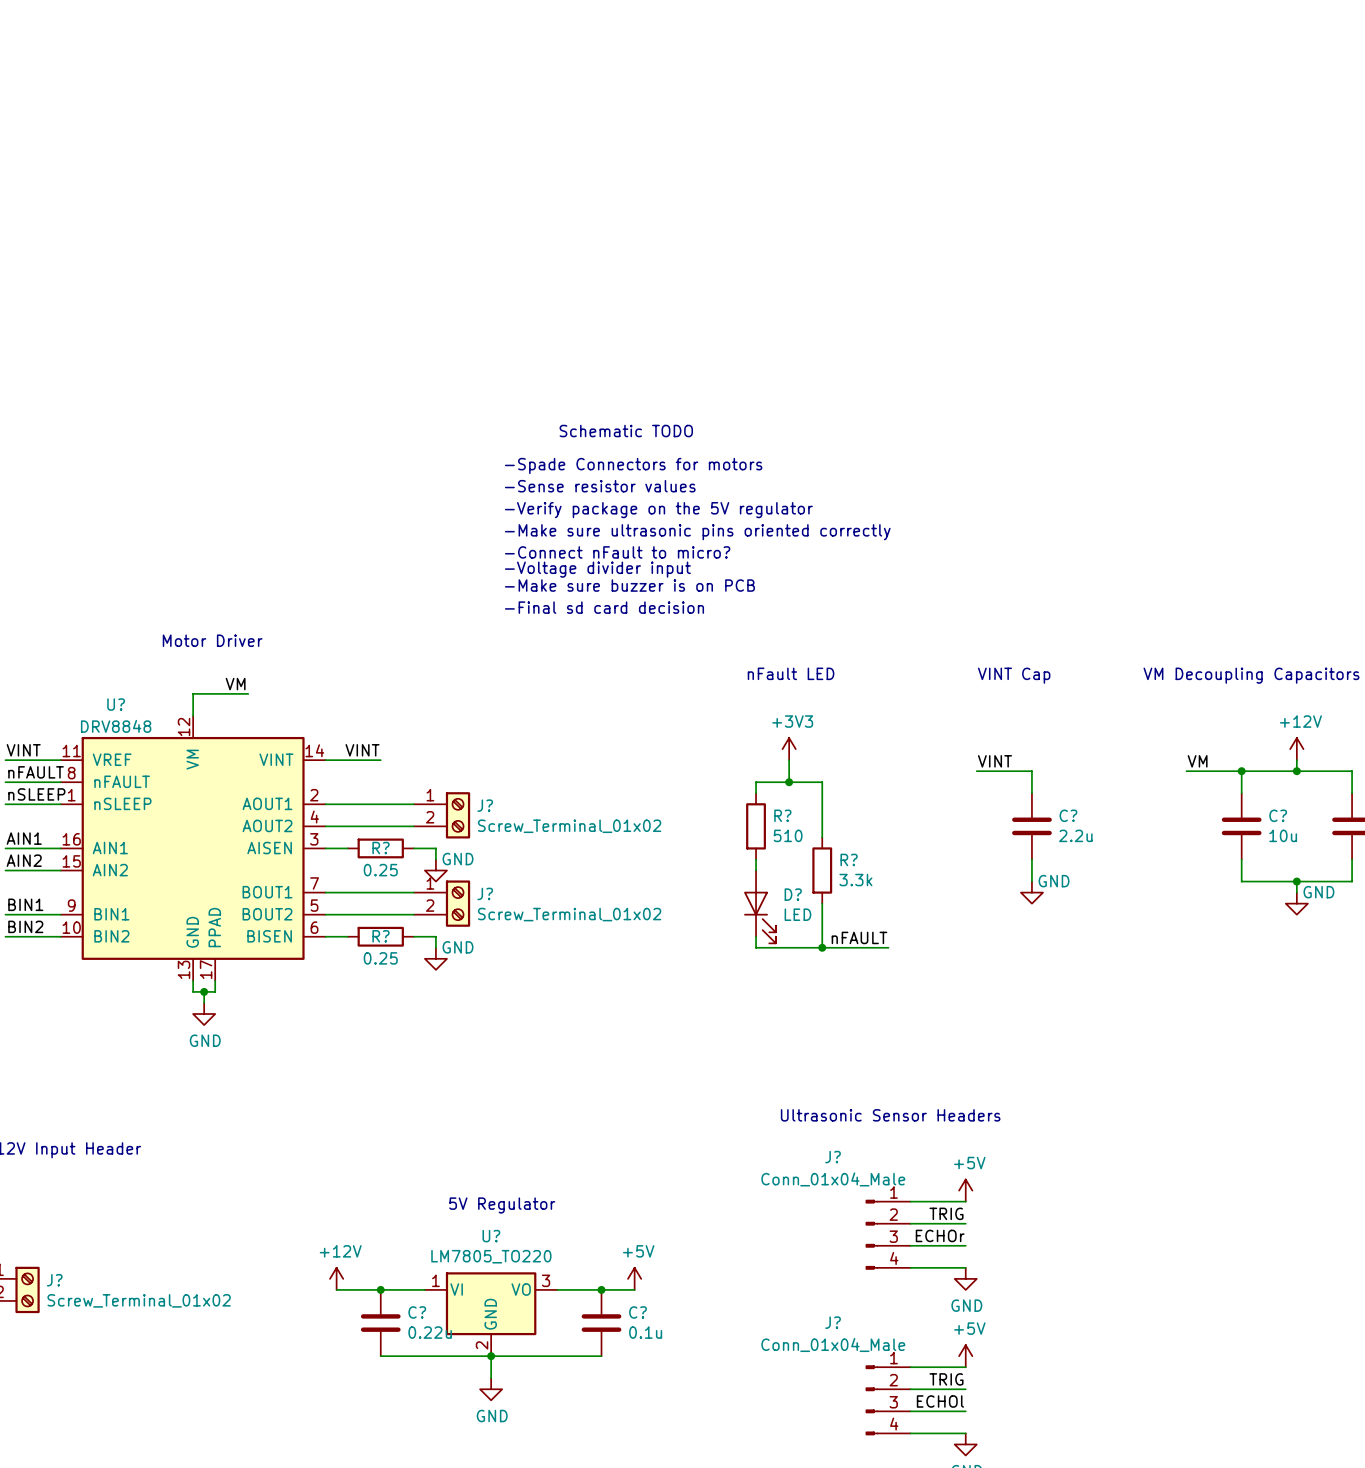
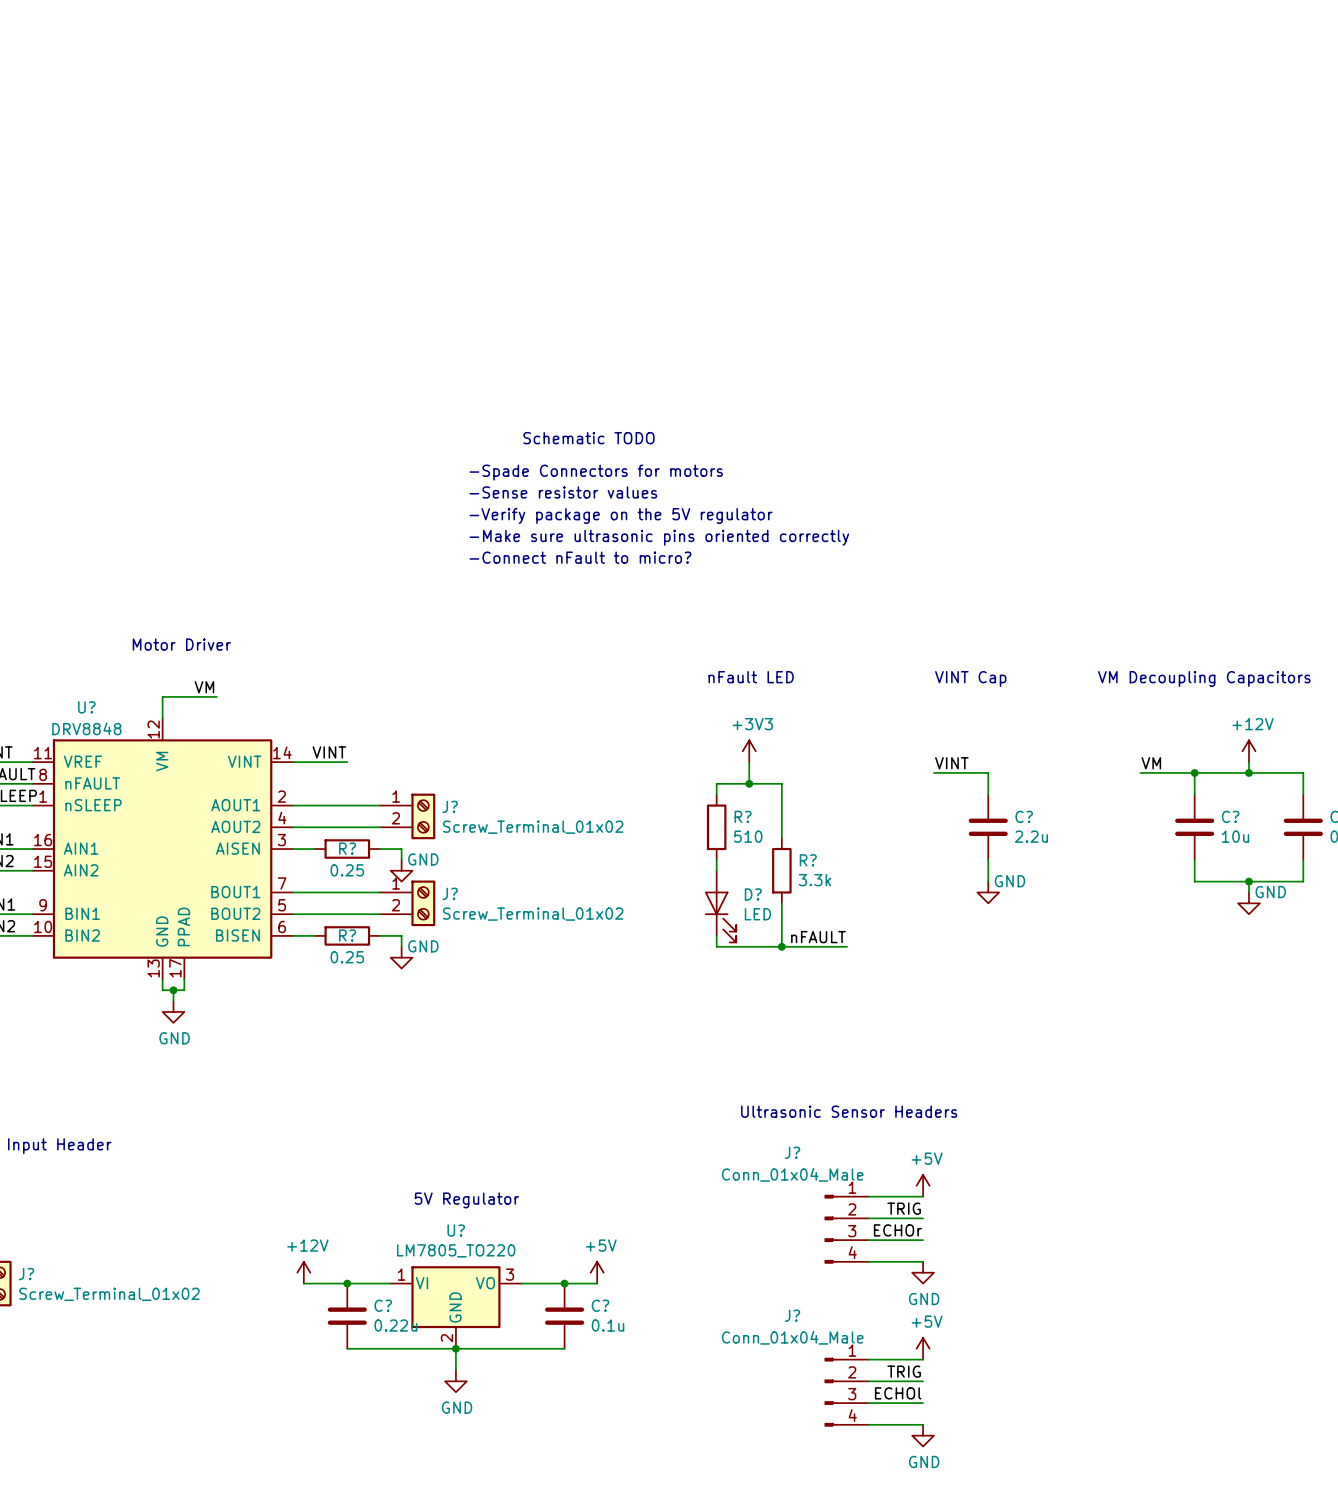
text: -Voltage divider input (597, 569) -> none
text: -Make sure buzzer is on PCB (629, 585) -> none
text: -Final sd card decision (604, 607) -> none

